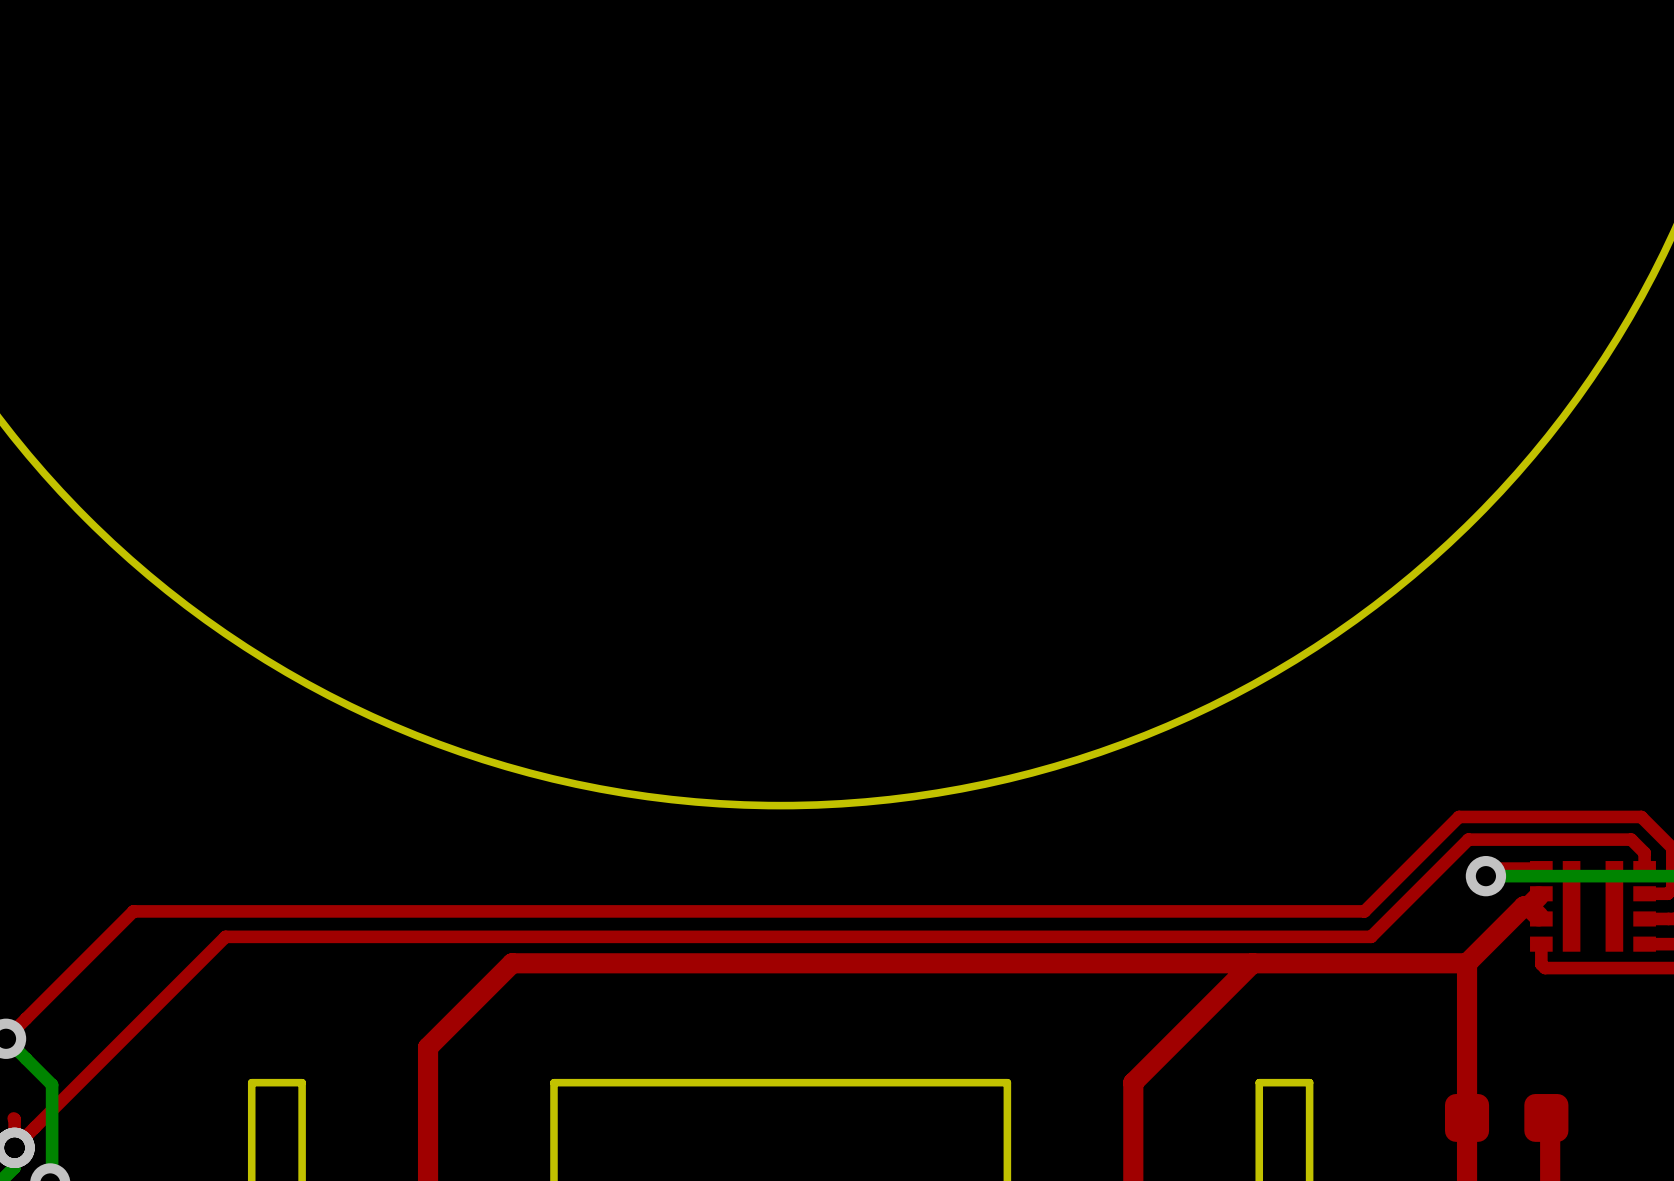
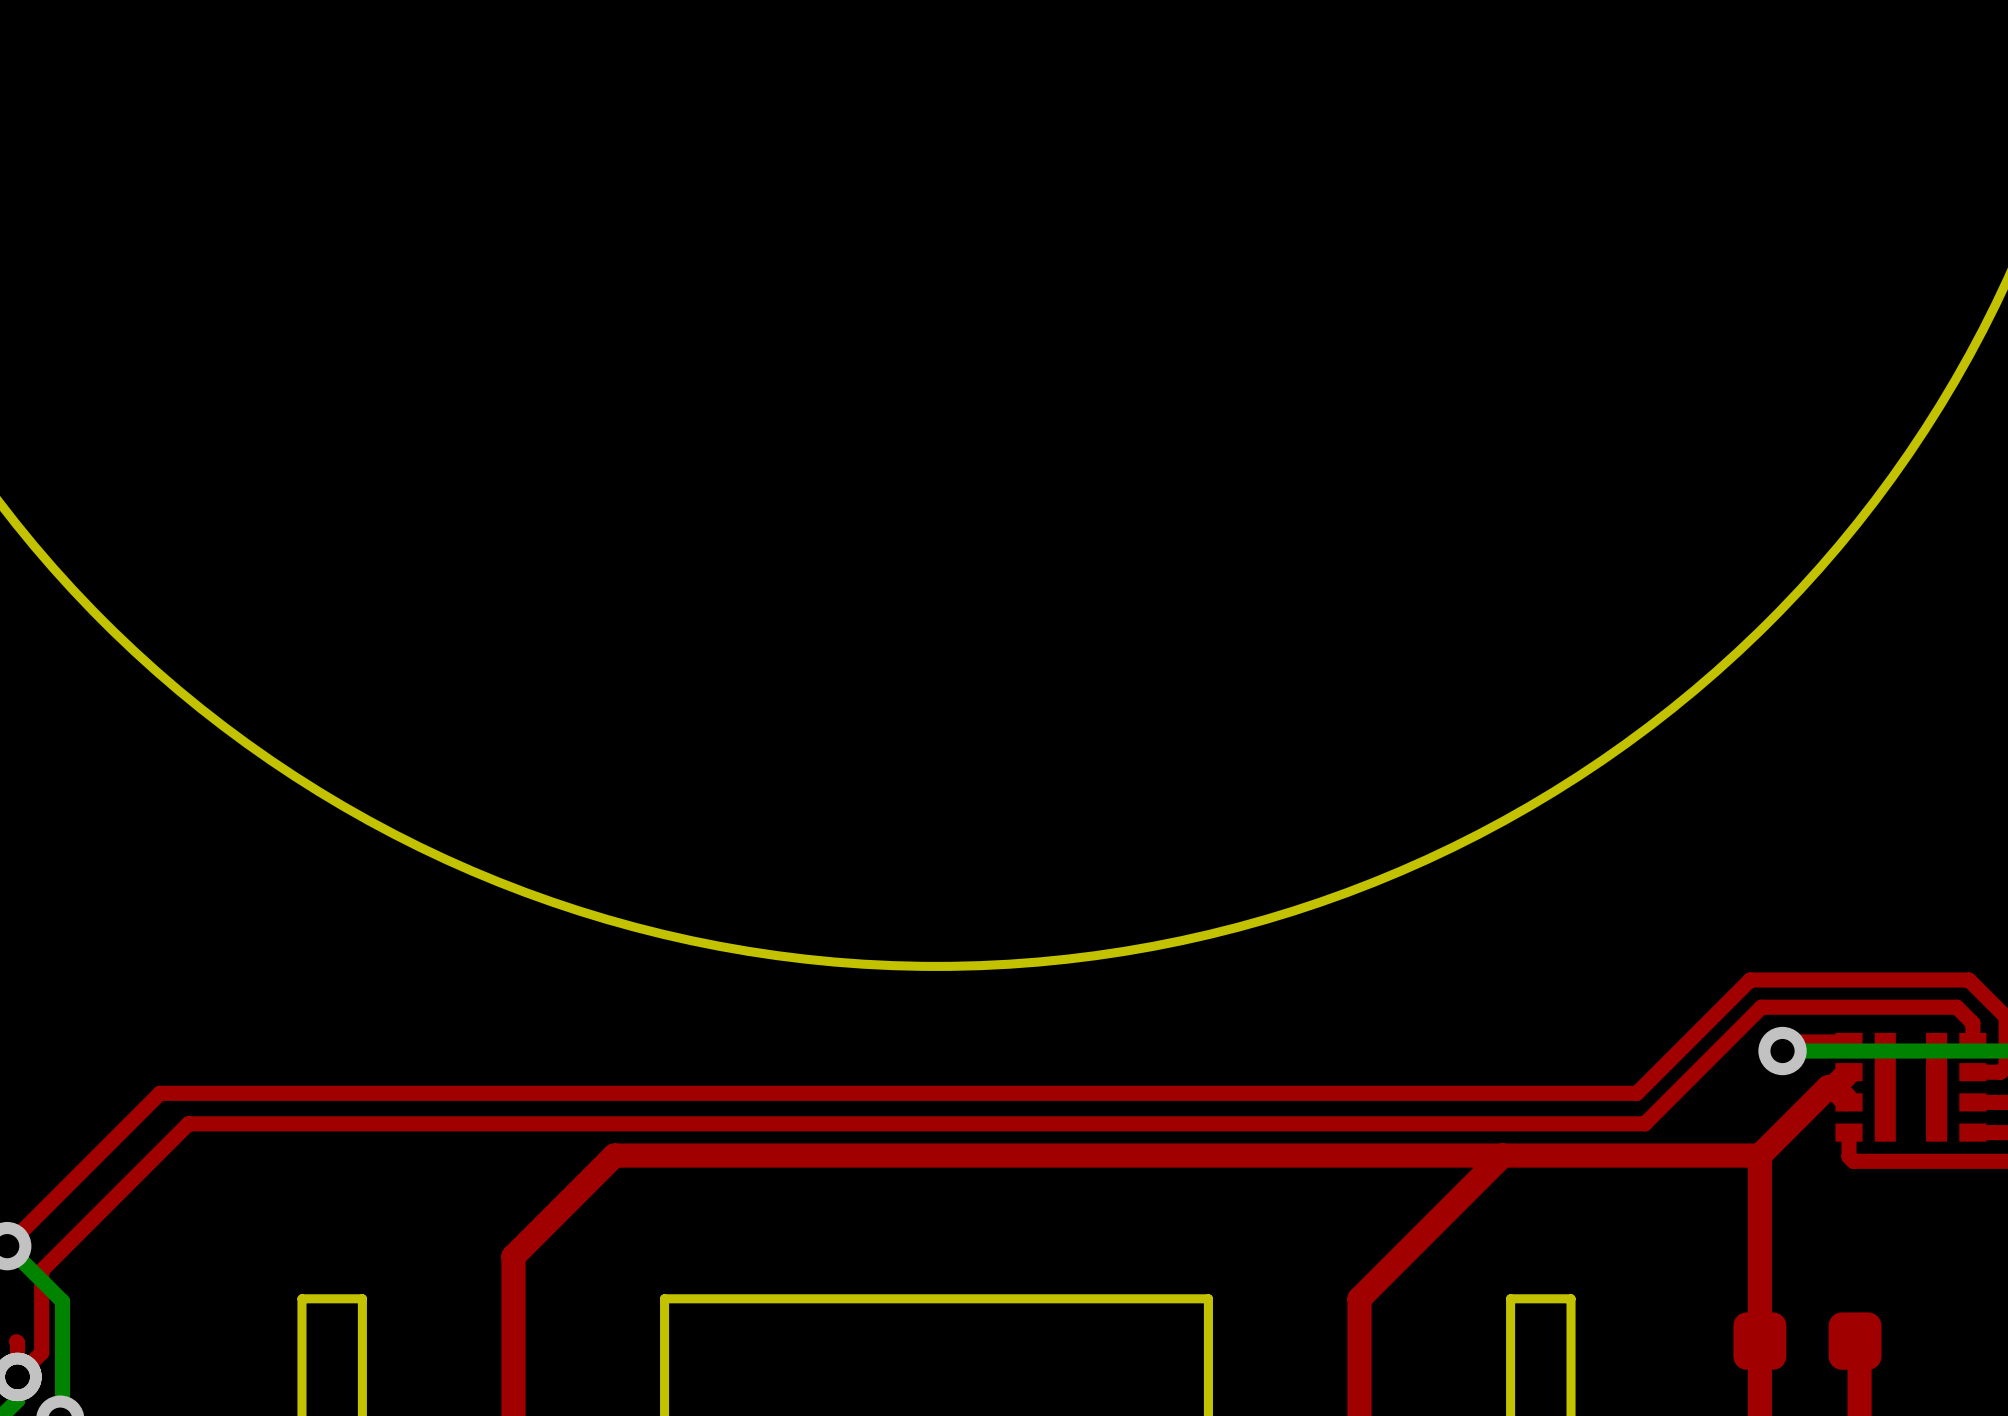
top track: (225, 936) (34, 1127) -> (270, 1123) (188, 1123) (41, 1270) (41, 1352)

